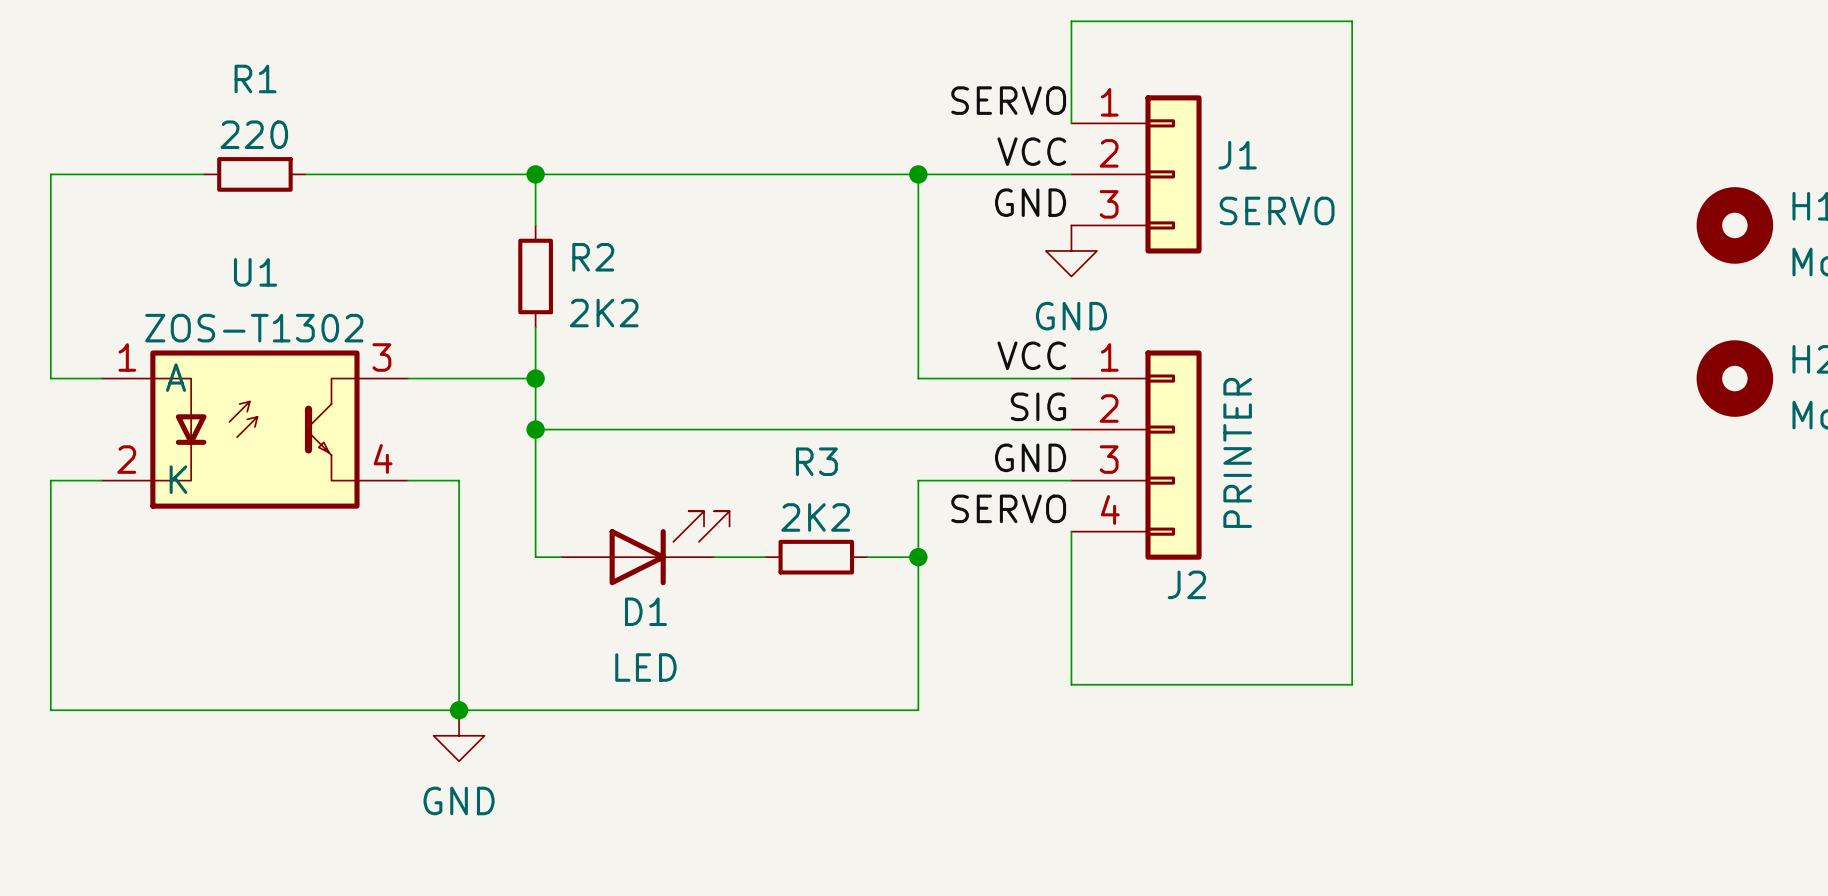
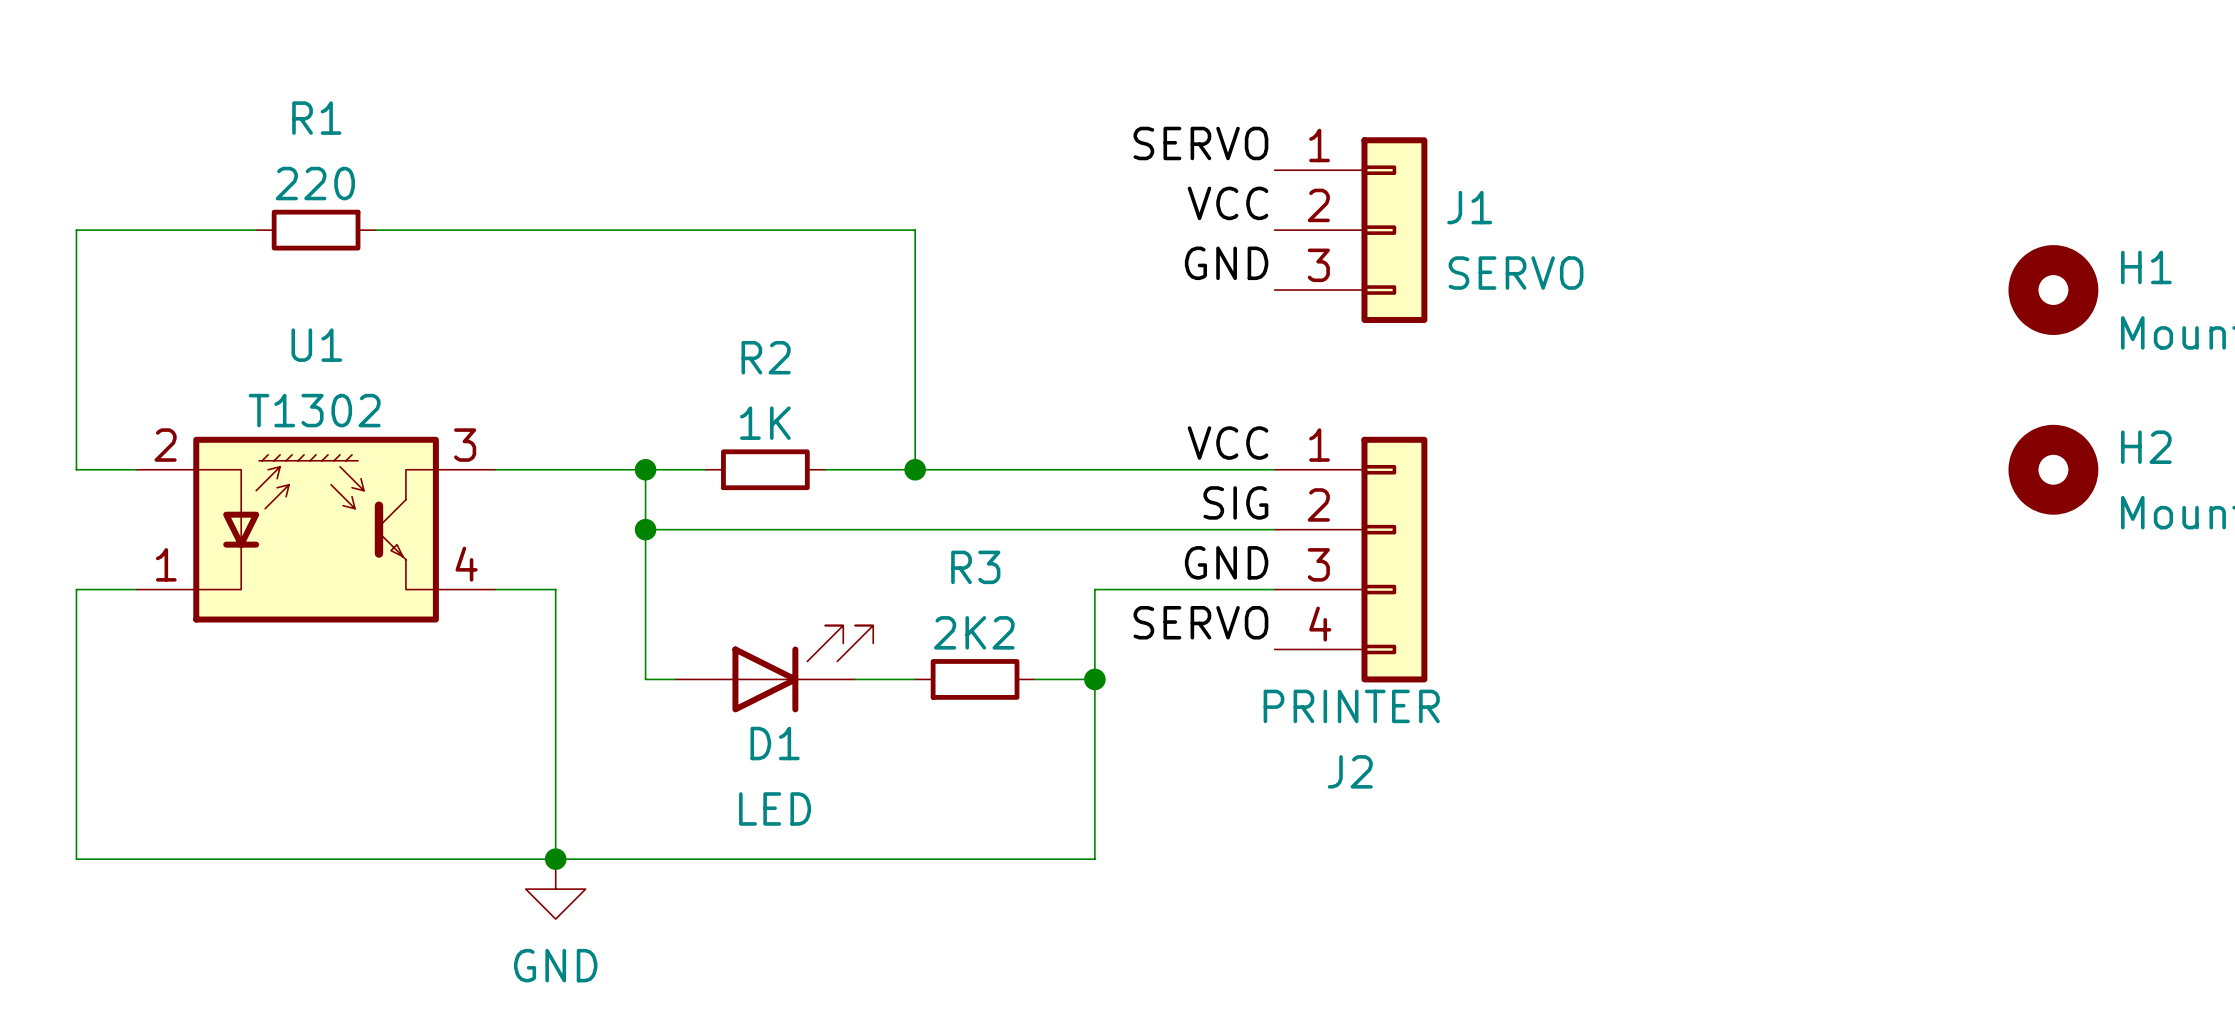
wire: (1071, 123) (1071, 21) (1352, 21) (1352, 684) (1071, 684) (1071, 531) -> none
wire: (535, 174) (535, 225) -> none
junction: (535, 174) -> none
wire: (765, 174) (1071, 174) -> (915, 230) (915, 469)
wire: (918, 174) (918, 378) -> (825, 469) (1094, 469)
junction: (918, 174) -> none
power symbol: GND (1071, 250) -> none
R2 name position: R2 (593, 257) -> R2 (766, 357)
R2 rotation: 0° (535, 276) -> 90° clockwise (765, 469)
R2 position: (535, 276) -> (765, 469)
R2 value: 2K2 (604, 313) -> 1K (765, 423)
wire: (535, 327) (535, 378) -> (705, 469) (645, 469)
U1 value: ZOS-T1302 (254, 328) -> T1302 (314, 410)
U1 symbol: [101, 350, 409, 509] -> [136, 436, 496, 623]
junction: none -> (915, 469)
J2 value rotation: 0° (1237, 452) -> 90° clockwise (1351, 706)
J2 name position: J2 (1186, 584) -> J2 (1350, 771)

